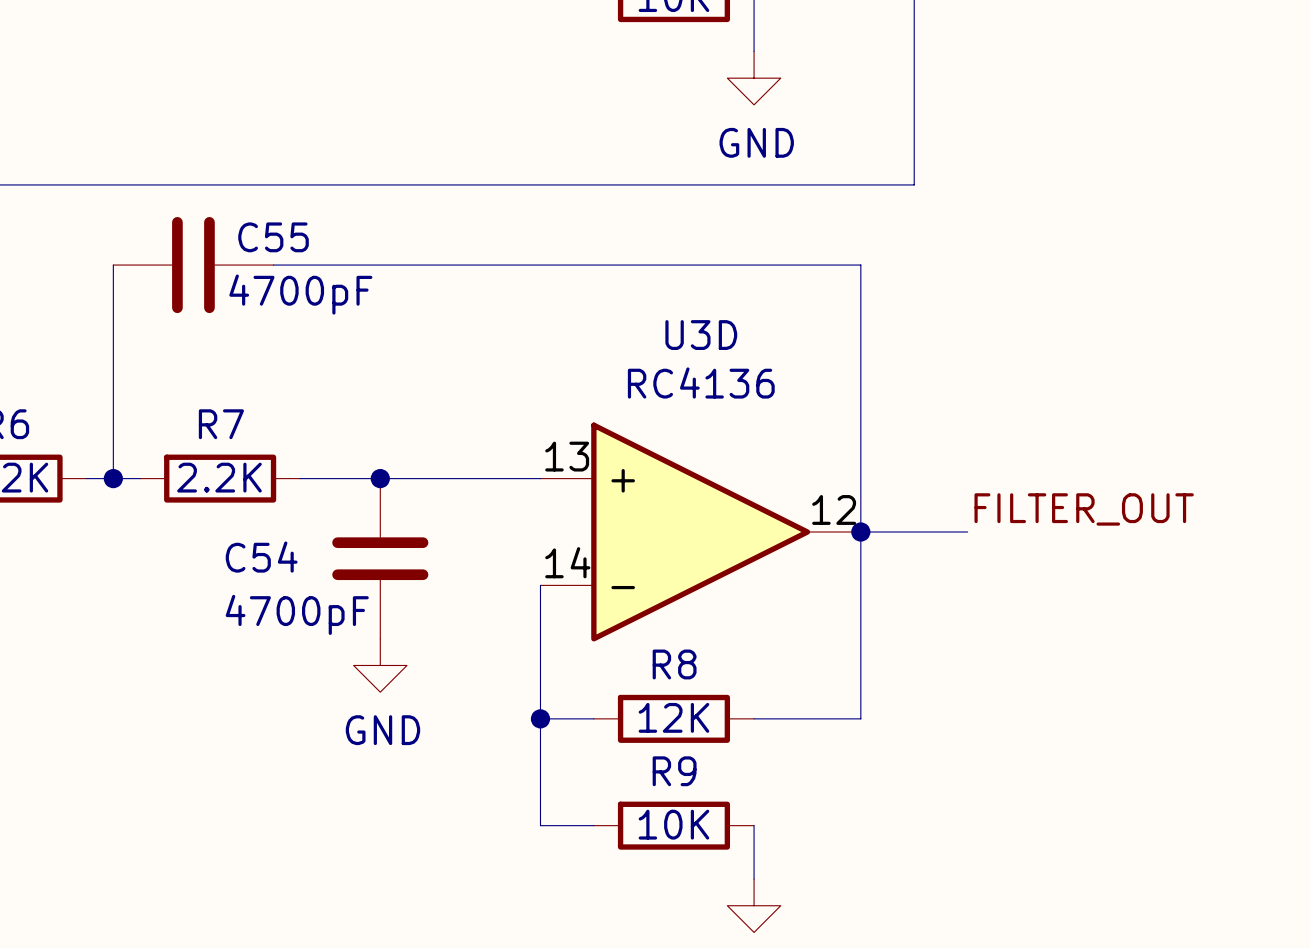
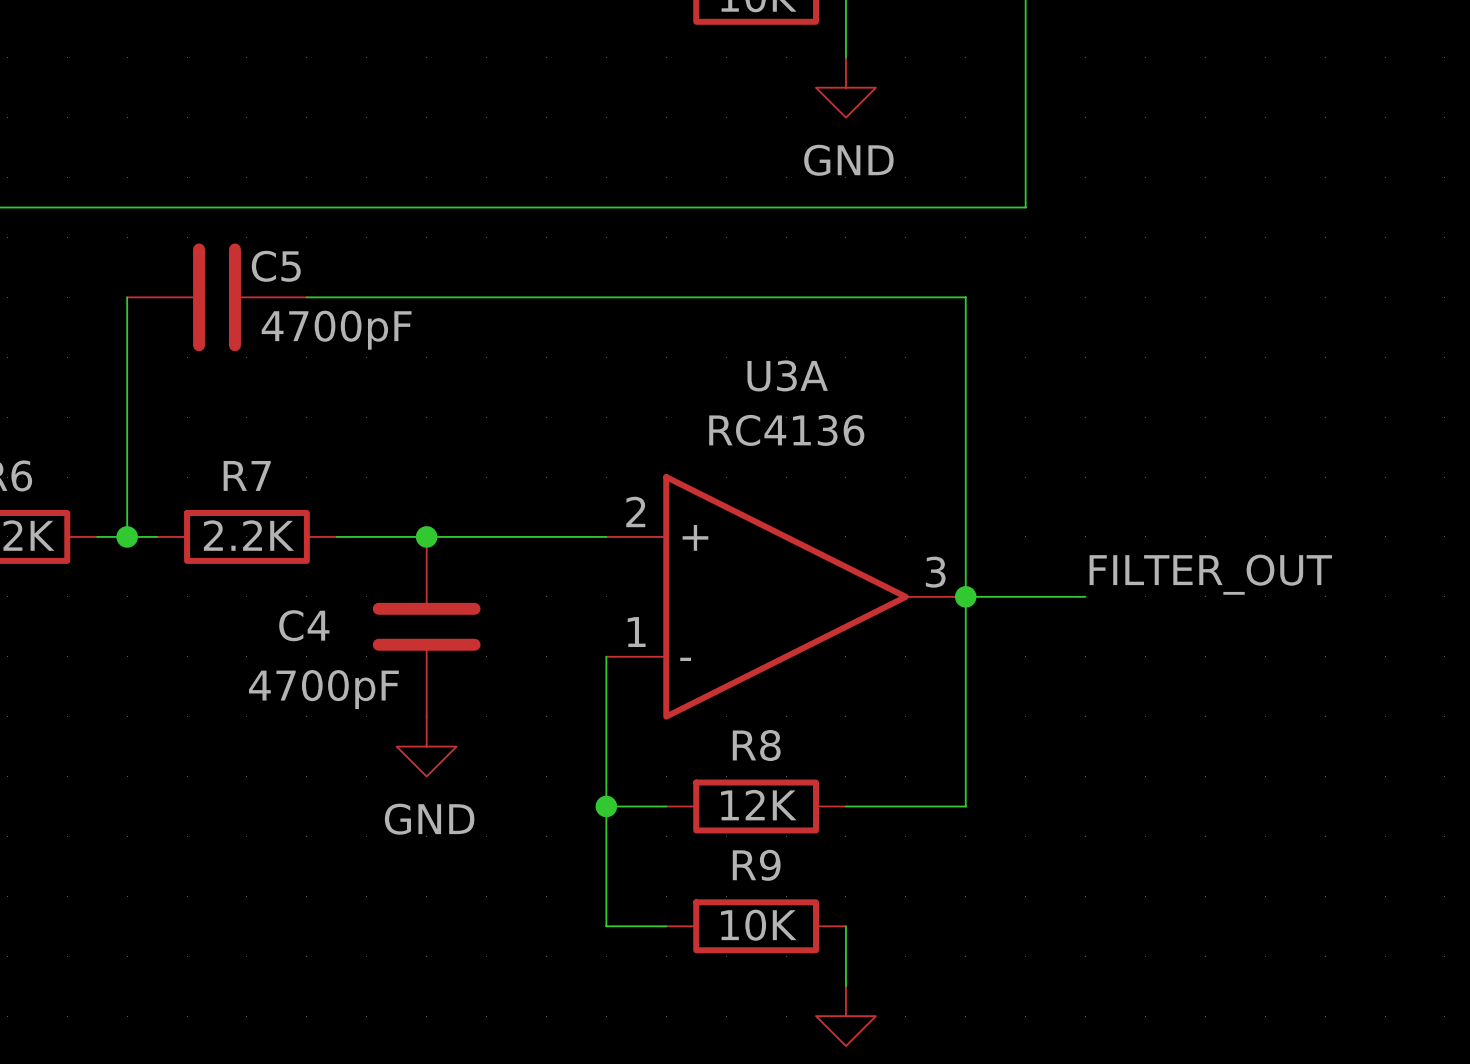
C55 name: C55 (273, 237) -> C5 (276, 266)
U3D name: U3D (701, 335) -> U3A (787, 375)
U3D pin number: 13 (567, 456) -> 2 (635, 511)
U3D pin number: 12 (834, 509) -> 3 (935, 572)
C54 name: C54 (261, 557) -> C4 (304, 625)
U3D pin number: 14 (567, 562) -> 1 (636, 632)

